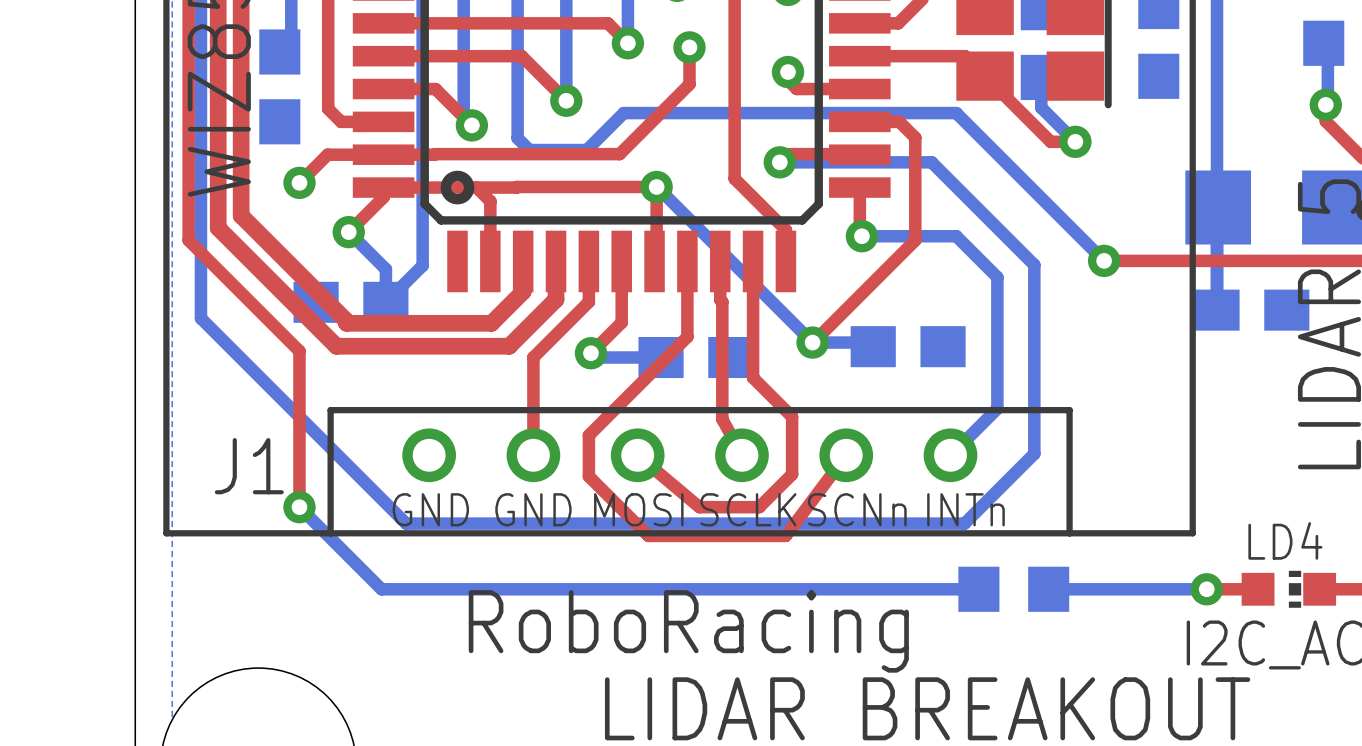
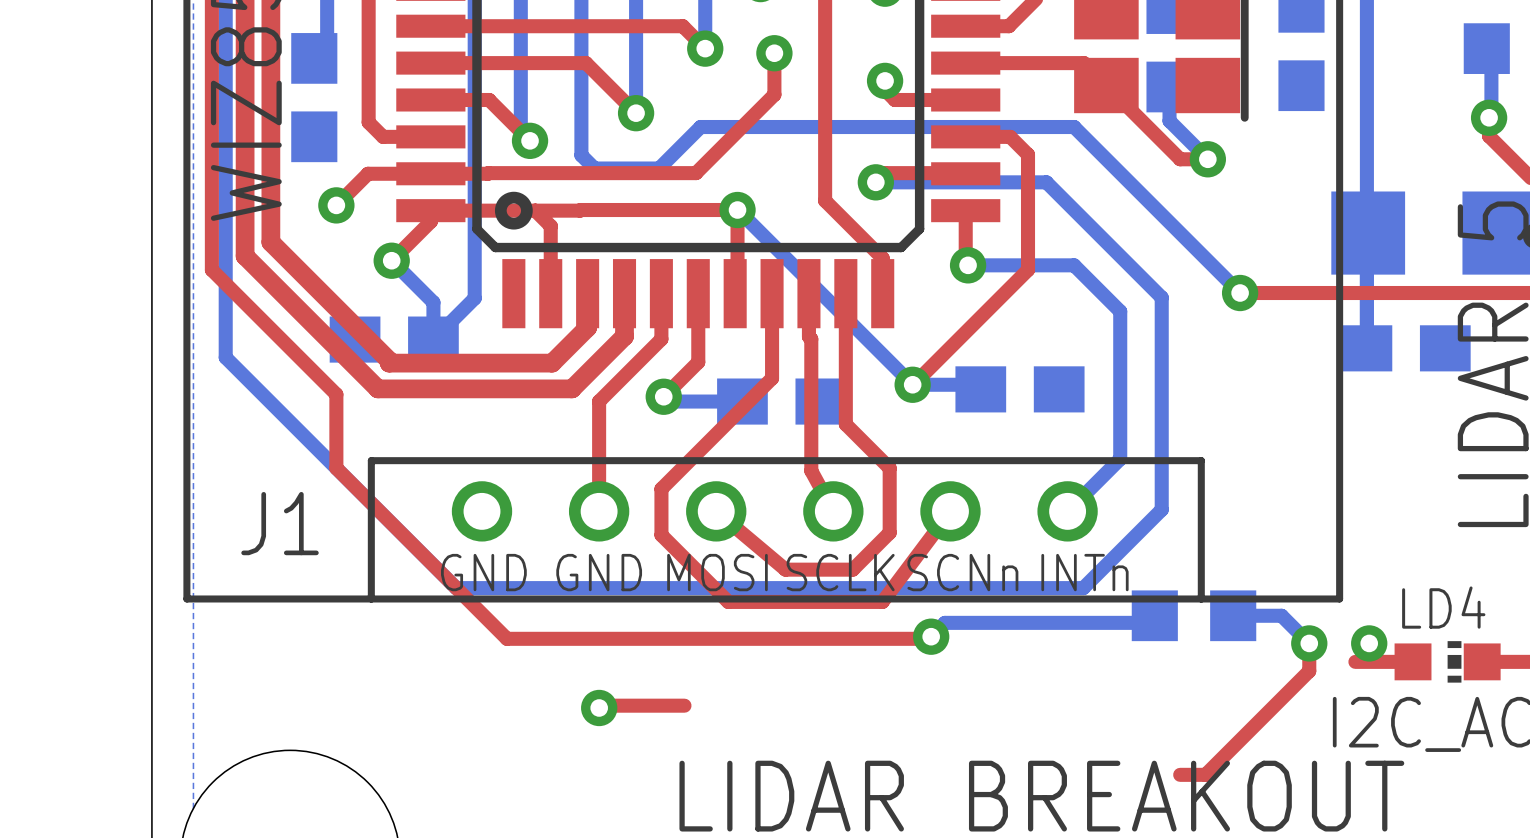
top track: (299, 416) (299, 507) -> (336, 468) (506, 638) (929, 638) (931, 636)
bottom track: (299, 507) (381, 589) (978, 589) -> none
via: (299, 507) -> none
bottom track: none -> (1154, 615) (1147, 622) (945, 622) (931, 636)
bottom track: none -> (1226, 615) (1281, 615) (1309, 643)
via: none -> (931, 636)
top track: none -> (1309, 643) (1309, 671) (1205, 774) (1180, 774)
via: none -> (1309, 643)
part position: (1013, 589) -> (1194, 615)
bottom track: (1048, 589) (1206, 589) -> none
via position: (1206, 589) -> (1369, 643)
top track: none -> (684, 705) (601, 705) (599, 707)
via: none -> (599, 707)
text: RoboRacing (688, 631) -> none

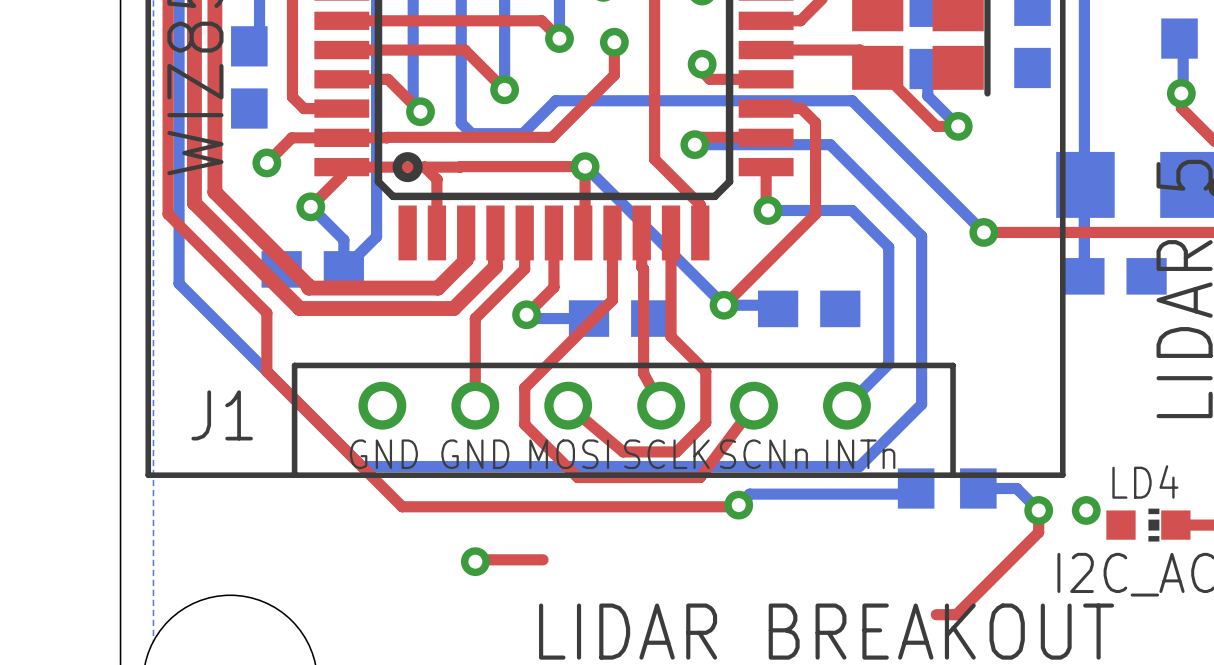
top track: (1355, 661) (1413, 661) -> none

